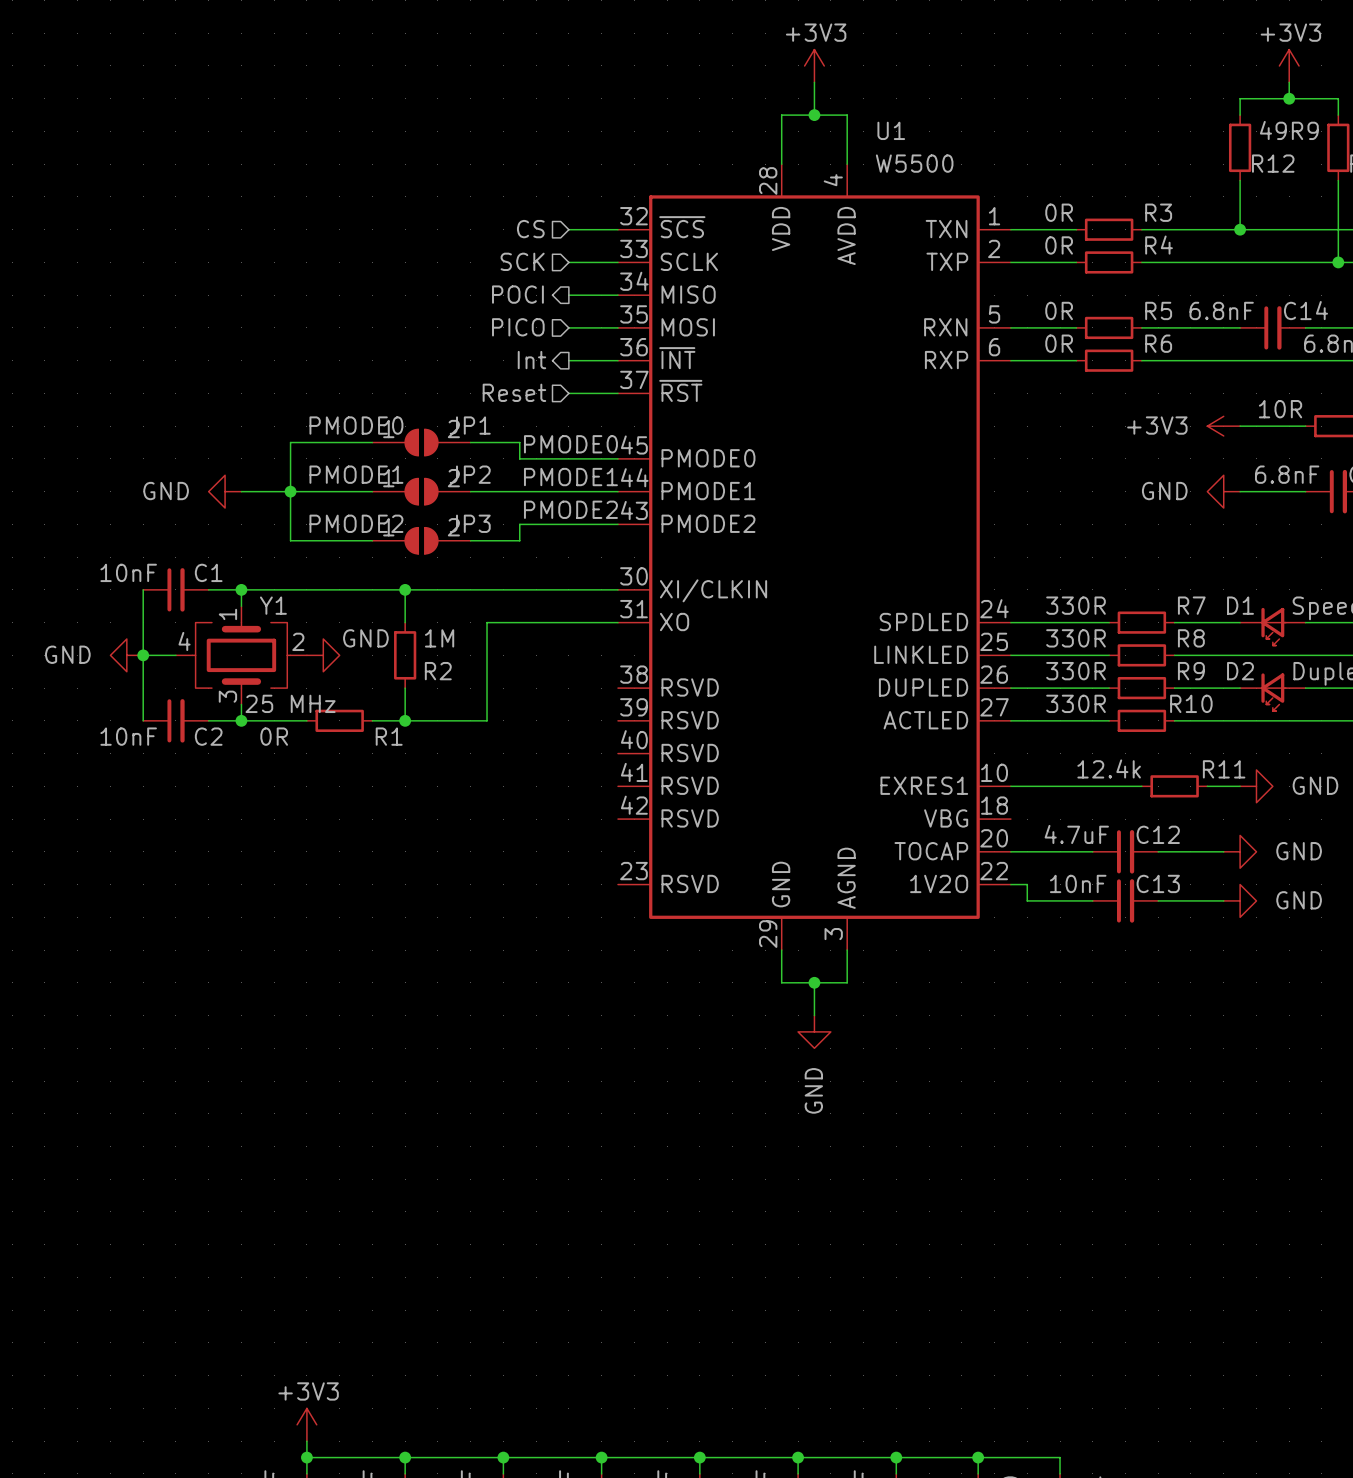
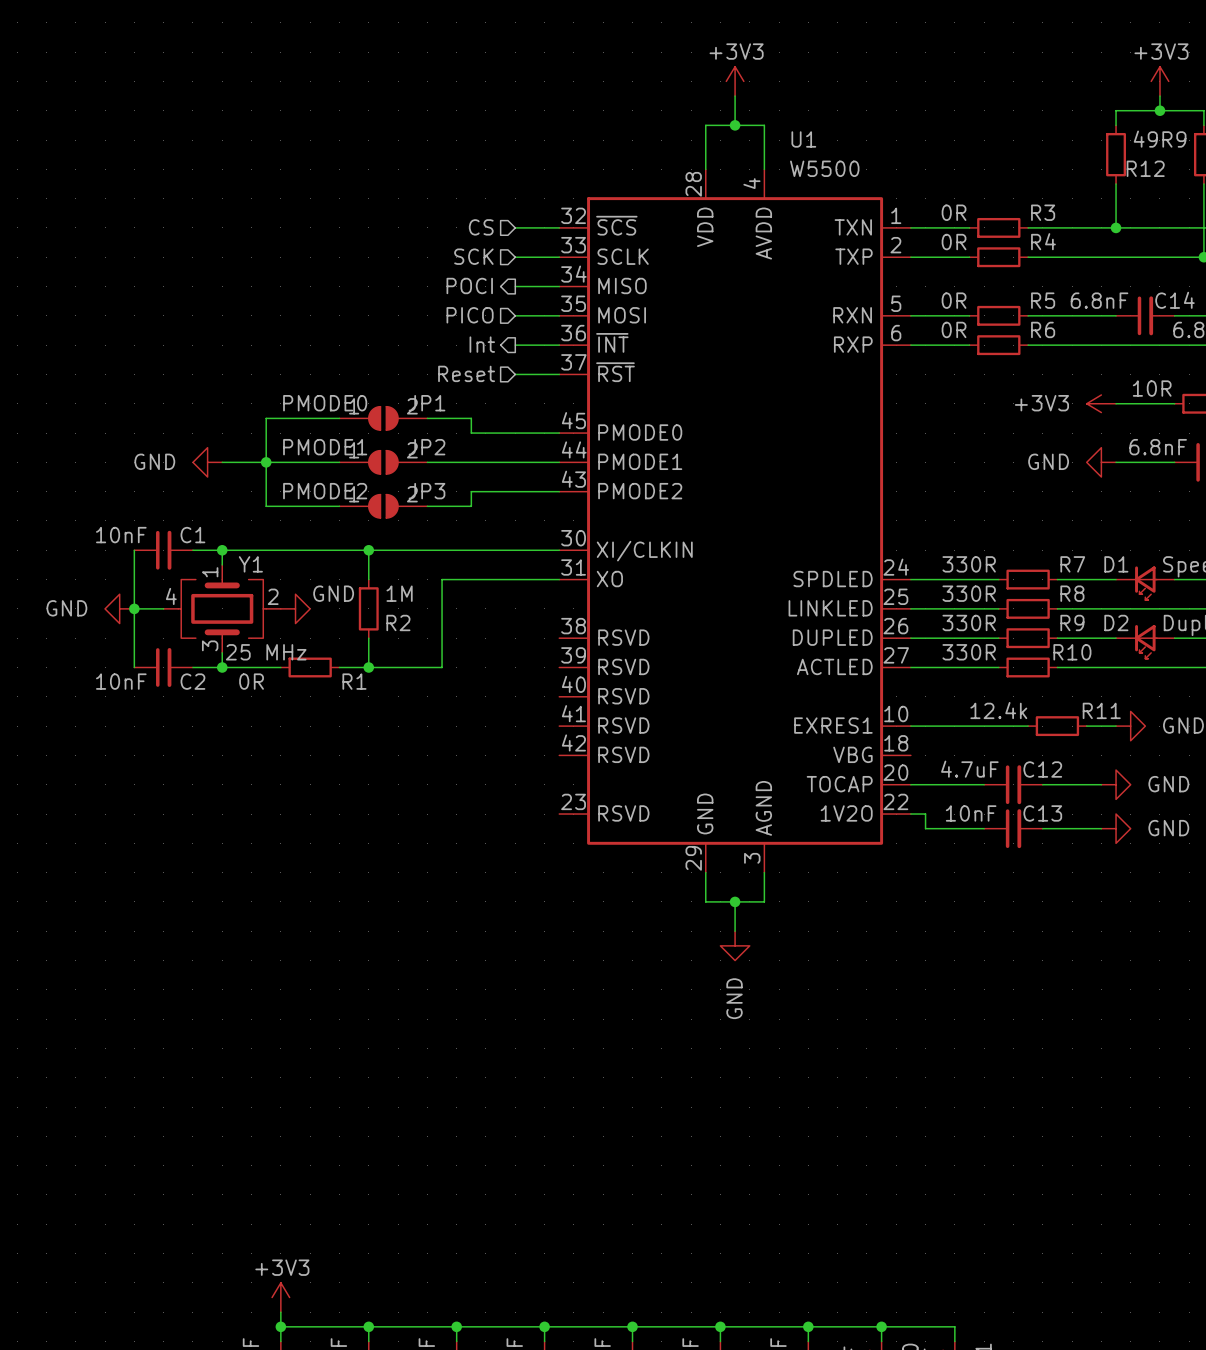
label: PMODE0 (570, 444) -> none
label: PMODE1 (570, 477) -> none
label: PMODE2 (570, 509) -> none

